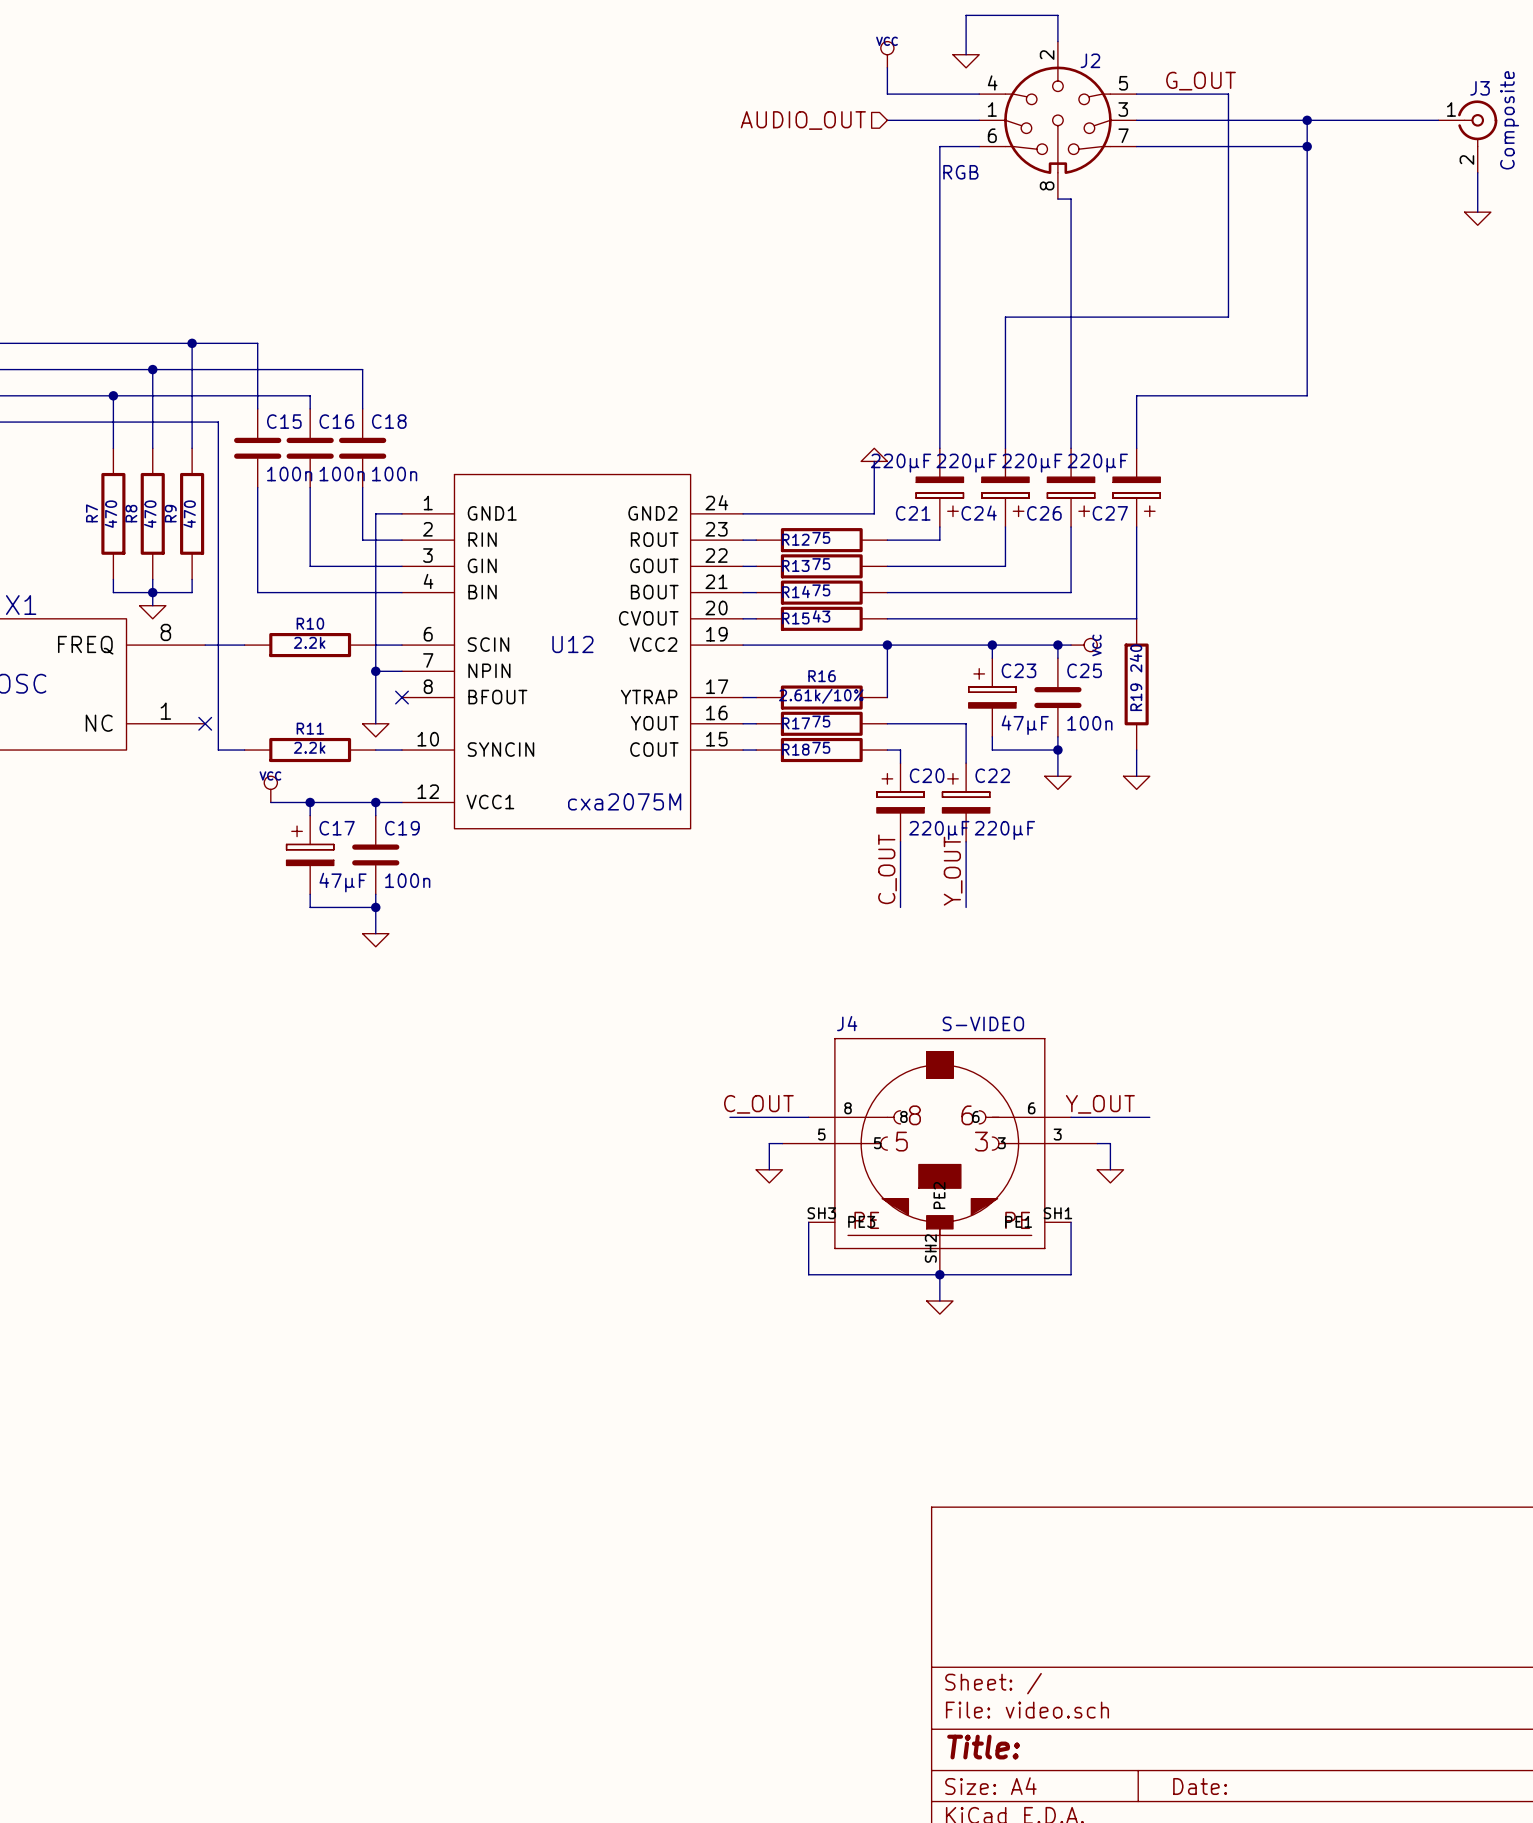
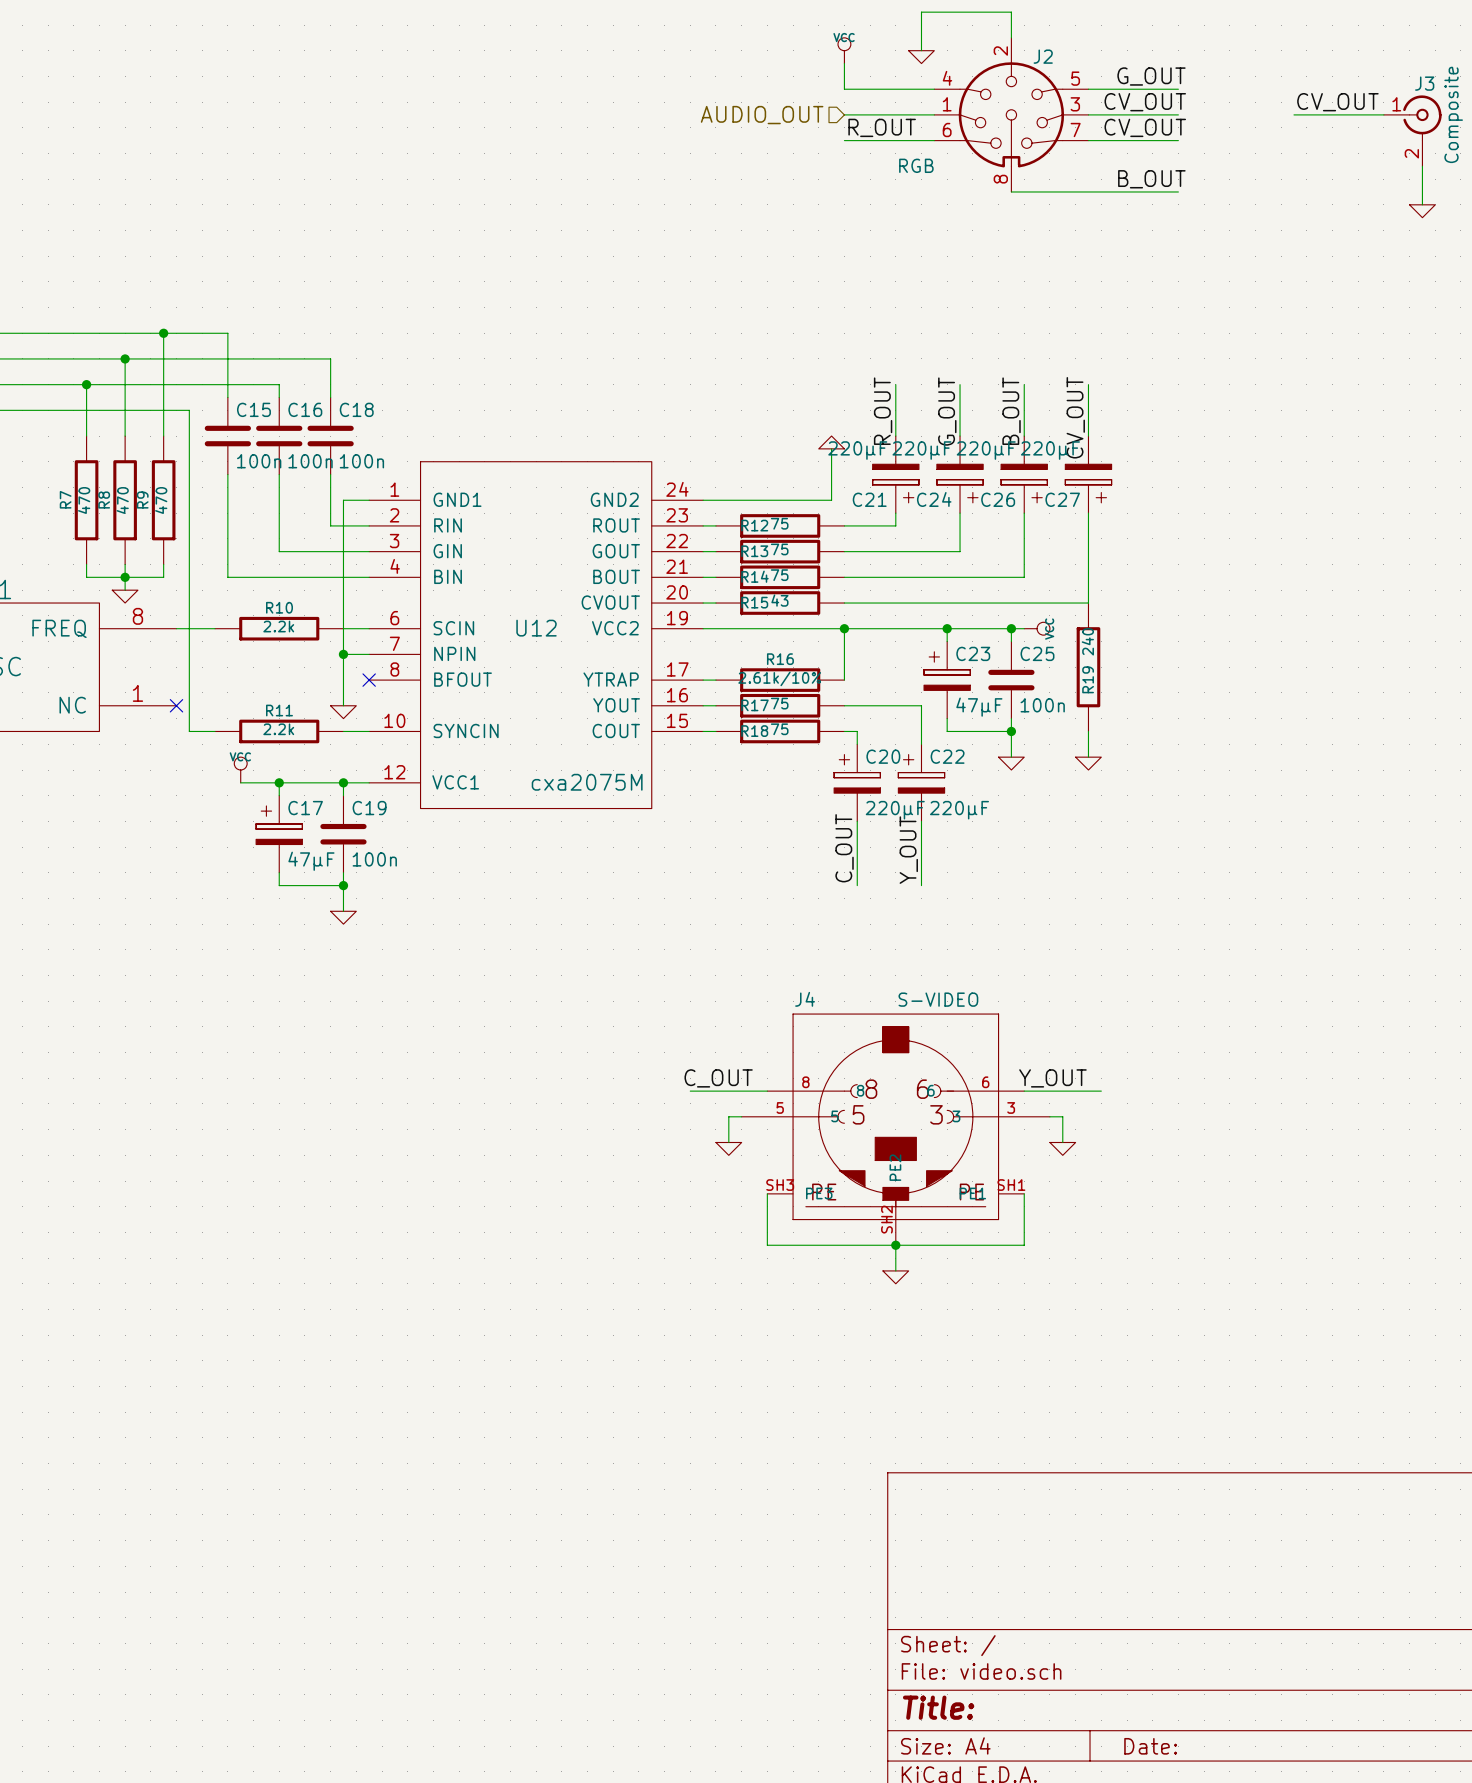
wire: (1228, 94) (1228, 317) (1005, 317) (1005, 395) -> none
label: none -> CV_OUT (1145, 102)
label: none -> CV_OUT (1337, 102)
wire: (1228, 120) (1346, 120) -> none
wire: (1307, 120) (1307, 395) (1136, 395) -> none
junction: (1307, 120) -> none
label: none -> R_OUT (882, 127)
label: none -> CV_OUT (1145, 127)
wire: (939, 146) (939, 395) -> (895, 140) (844, 140)
wire: (1228, 146) (1307, 146) -> none
junction: (1307, 146) -> none
label: none -> B_OUT (1151, 179)
wire: (1071, 199) (1071, 395) -> (1024, 191) (1178, 191)
label: none -> R_OUT (883, 411)
label: none -> B_OUT (1011, 411)
label: none -> G_OUT (947, 411)
label: none -> CV_OUT (1075, 417)

